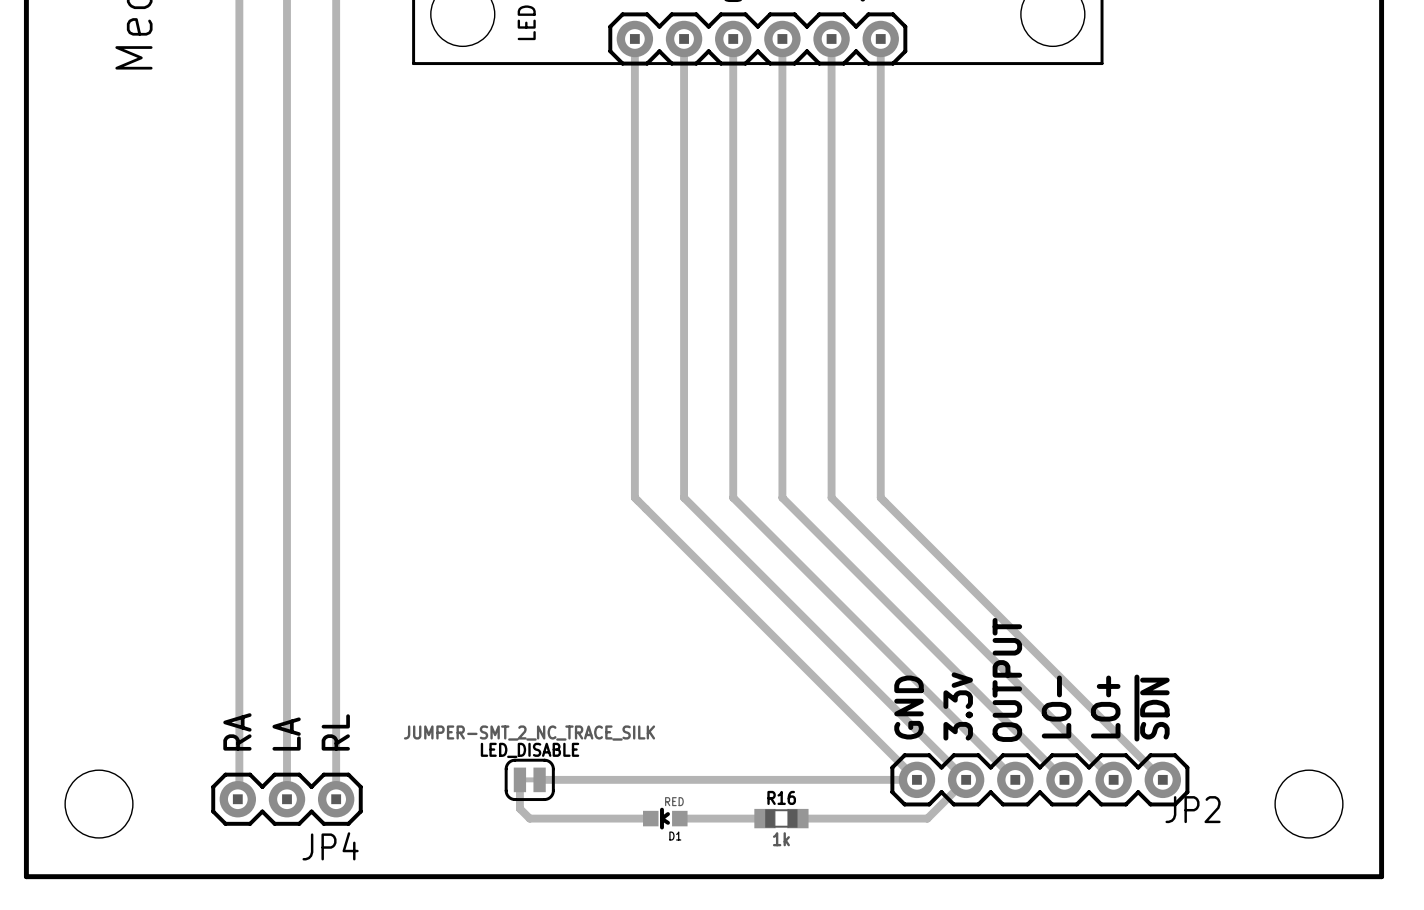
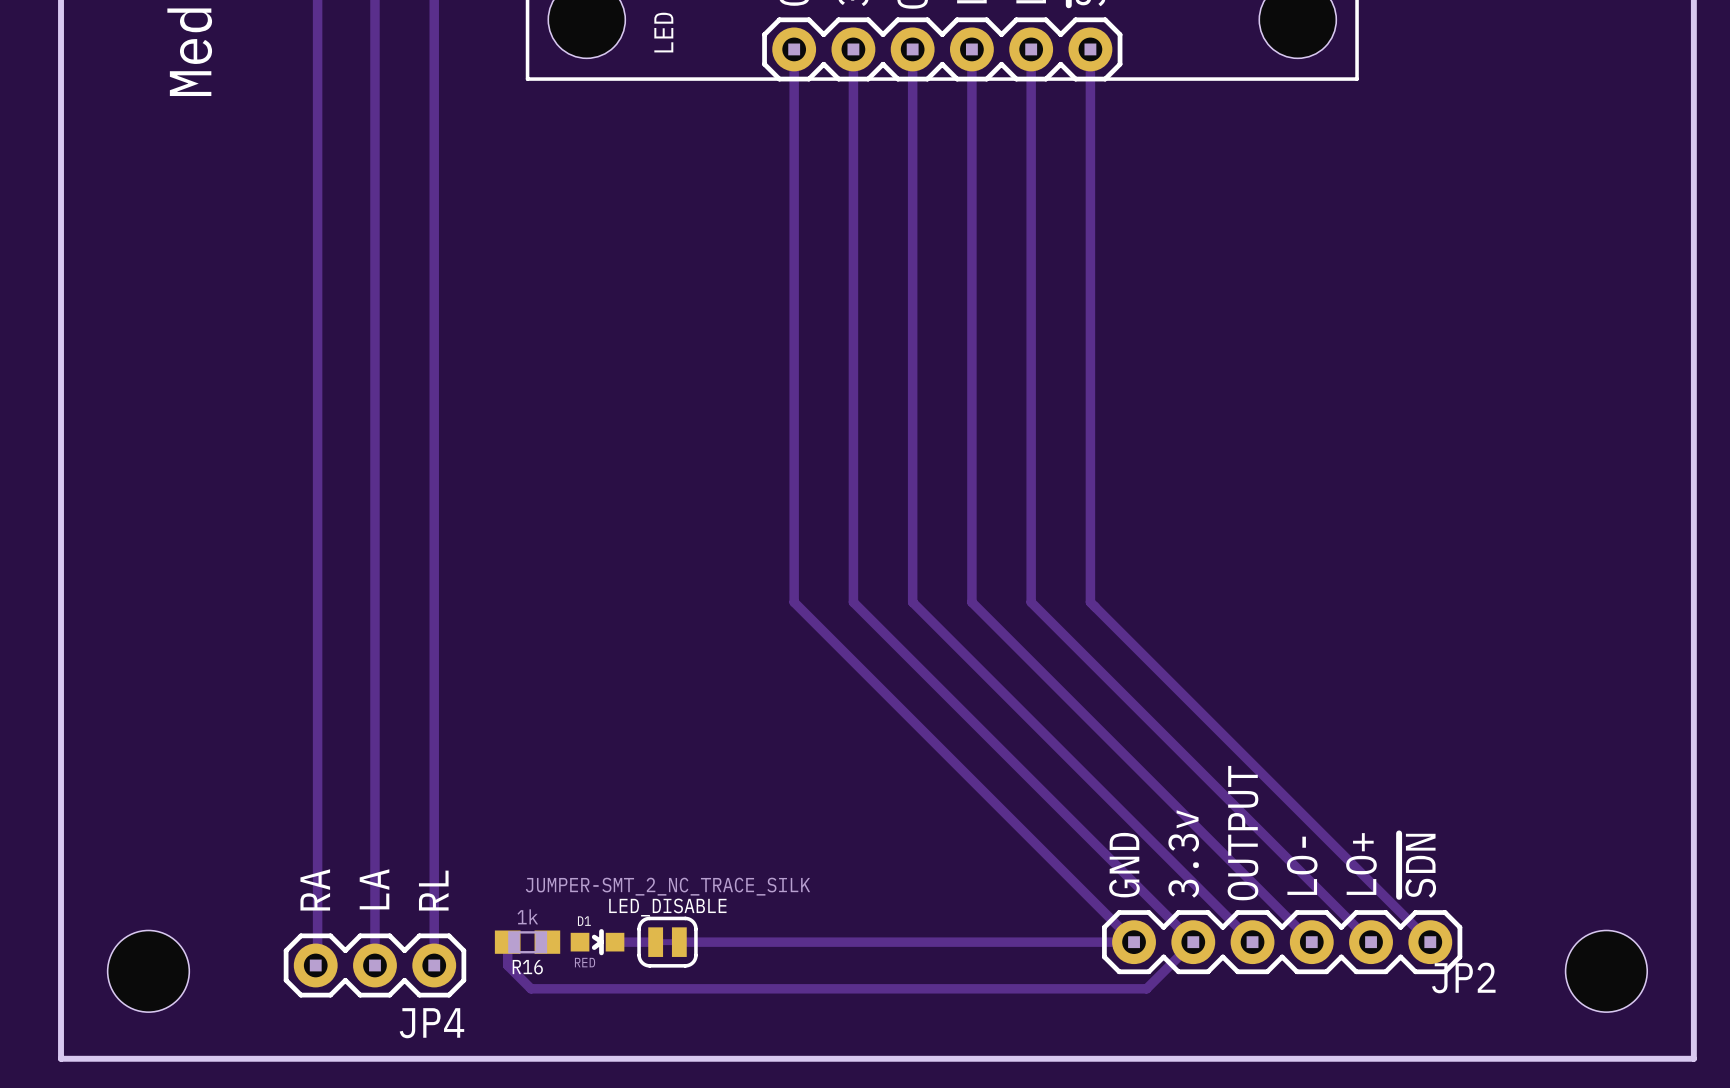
track: none -> (507, 942) (507, 965) (531, 988) (667, 988)
track: (519, 779) (519, 808) (529, 818) -> (655, 942) (615, 942)
R16 name position: R16 (781, 797) -> R16 (527, 967)
track: none -> (813, 988) (848, 988)
D1 rotation: 0° (665, 818) -> 180° (597, 942)
D1 position: (665, 818) -> (597, 942)
track: none -> (950, 988) (990, 988)
R16 position: (781, 818) -> (527, 942)
R16 value position: 1k (781, 839) -> 1k (527, 916)

